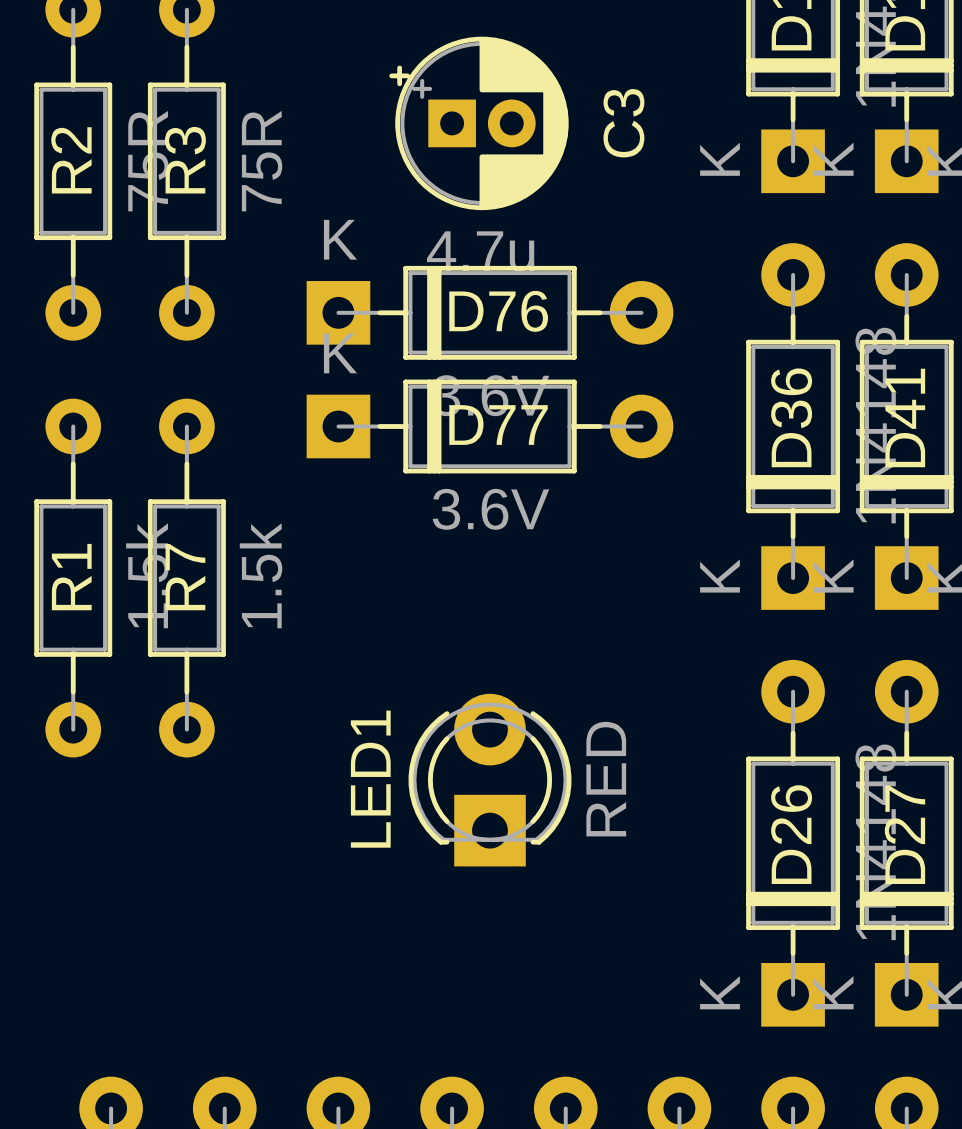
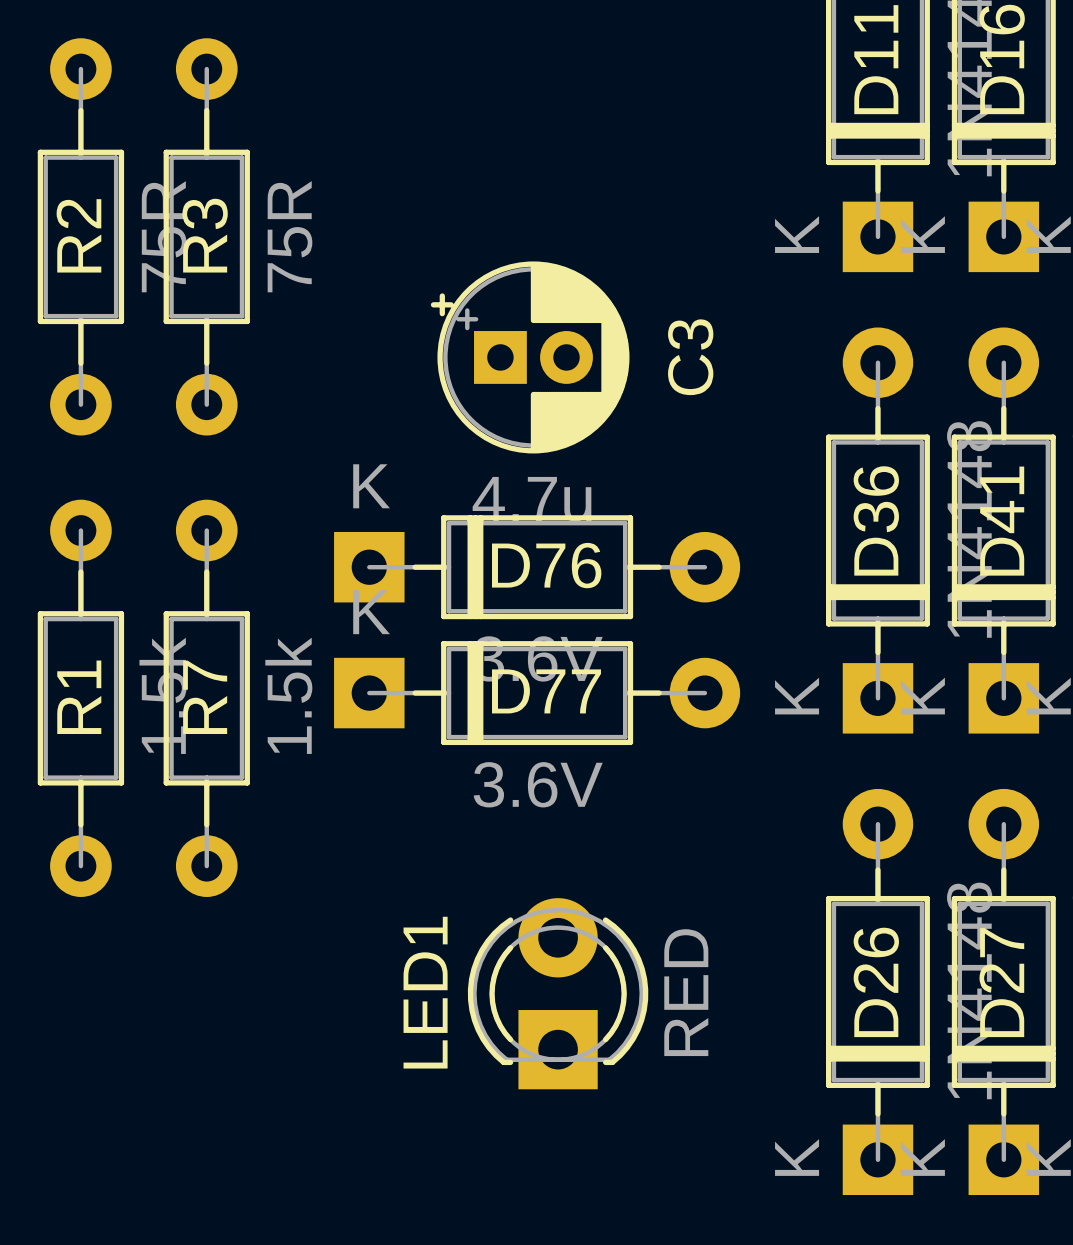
C3 position: (478, 123) -> (530, 357)
D76 position: (490, 312) -> (537, 567)
D77 position: (490, 426) -> (537, 693)
LED1 position: (490, 780) -> (558, 993)

